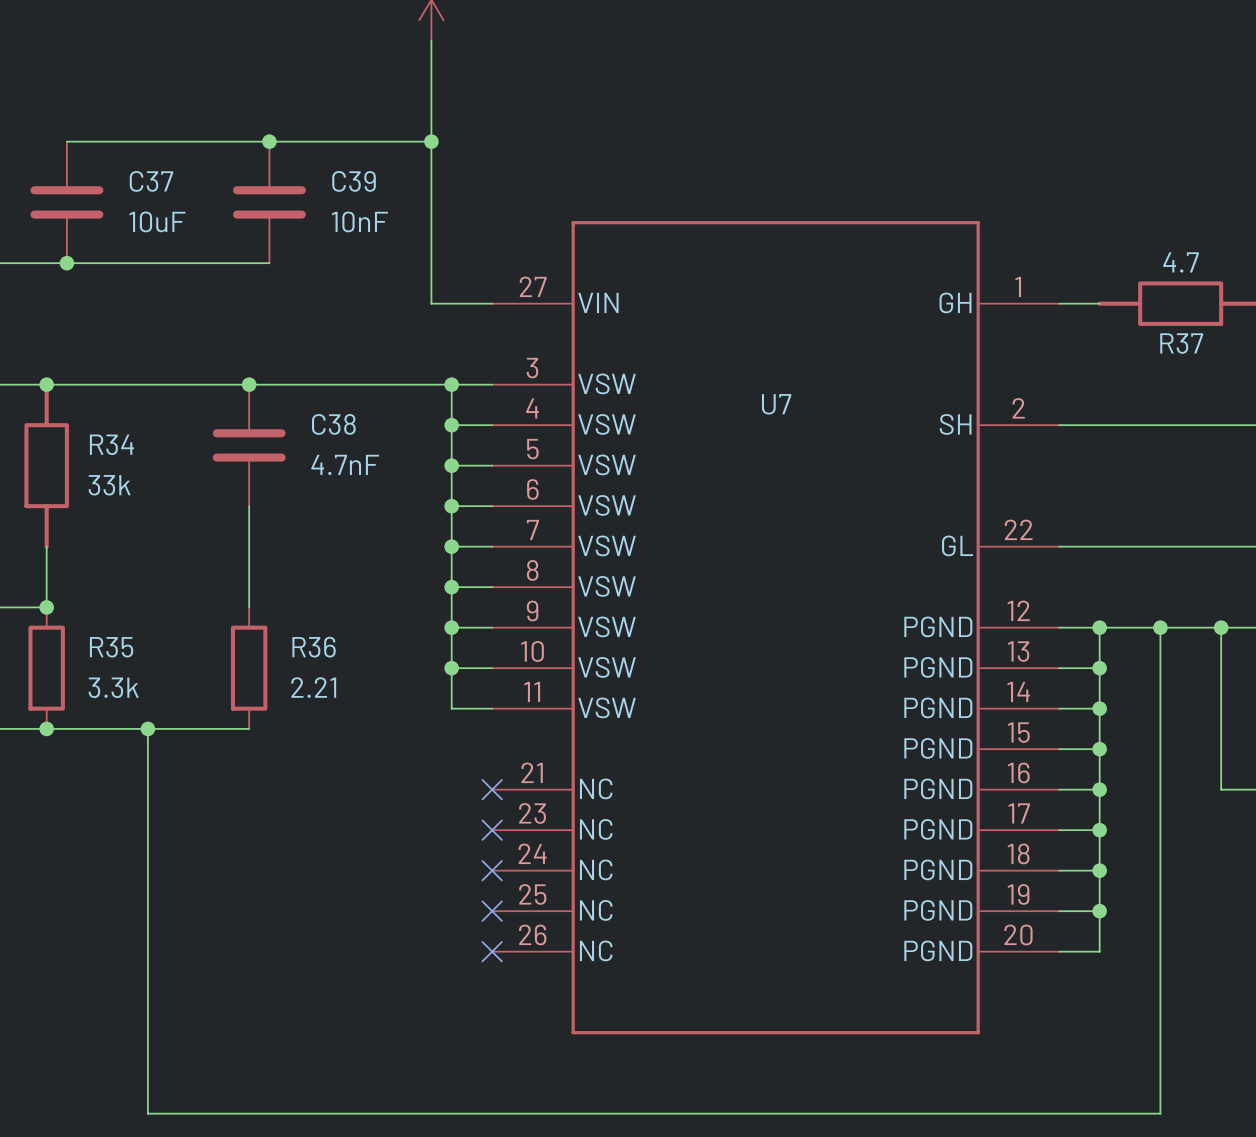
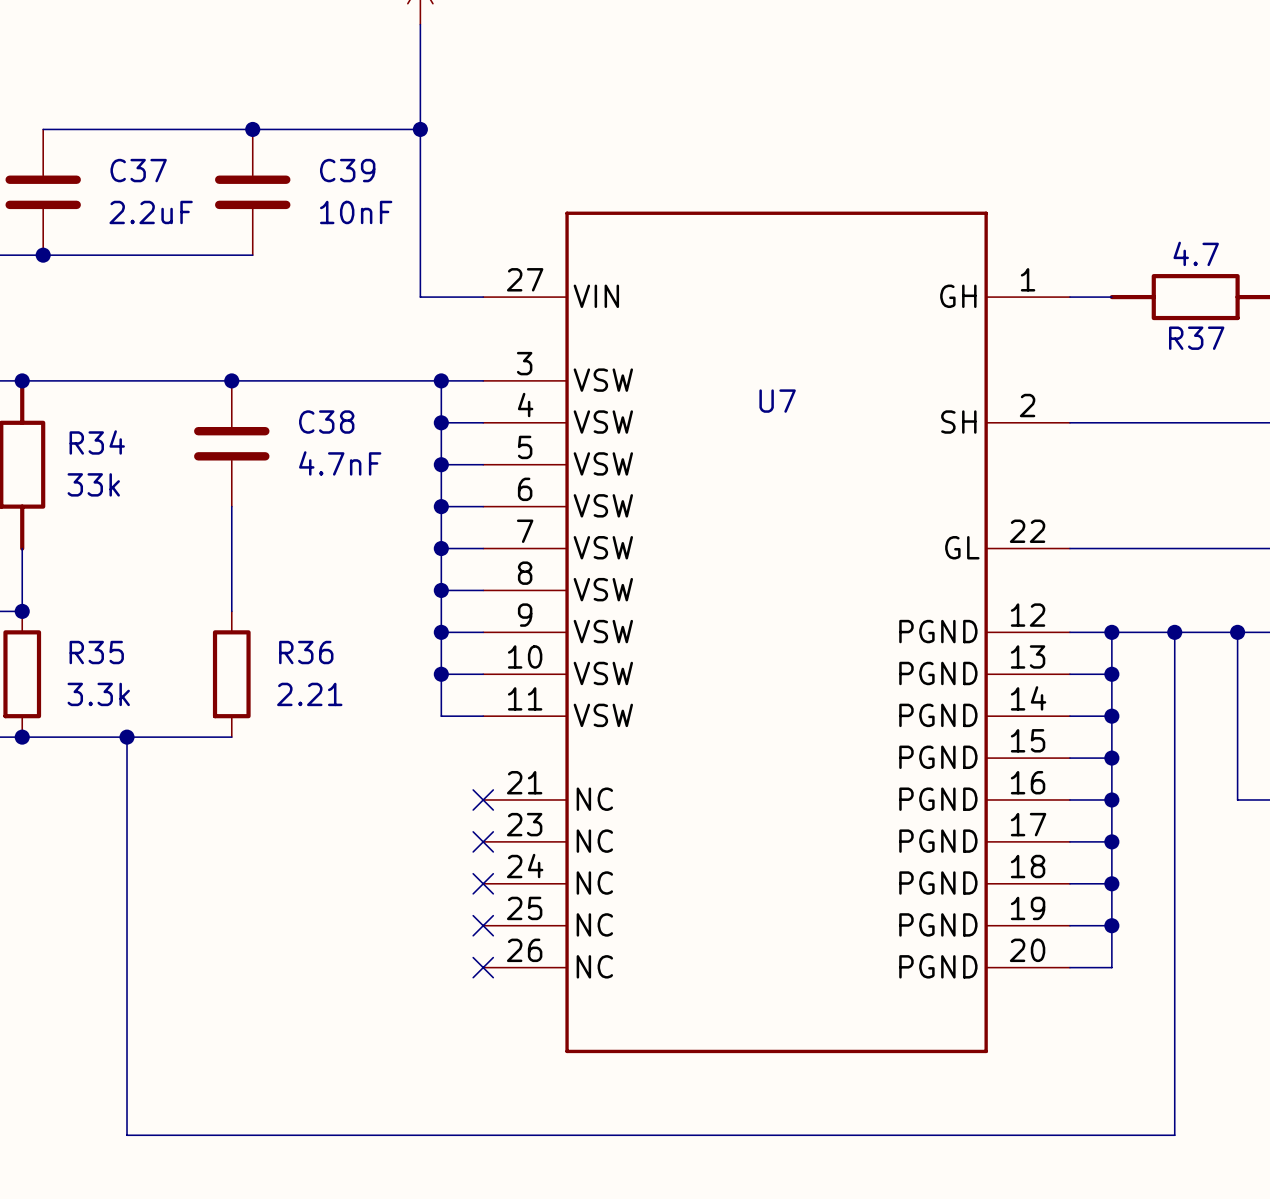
C37 value: 10uF (157, 221) -> 2.2uF (151, 212)

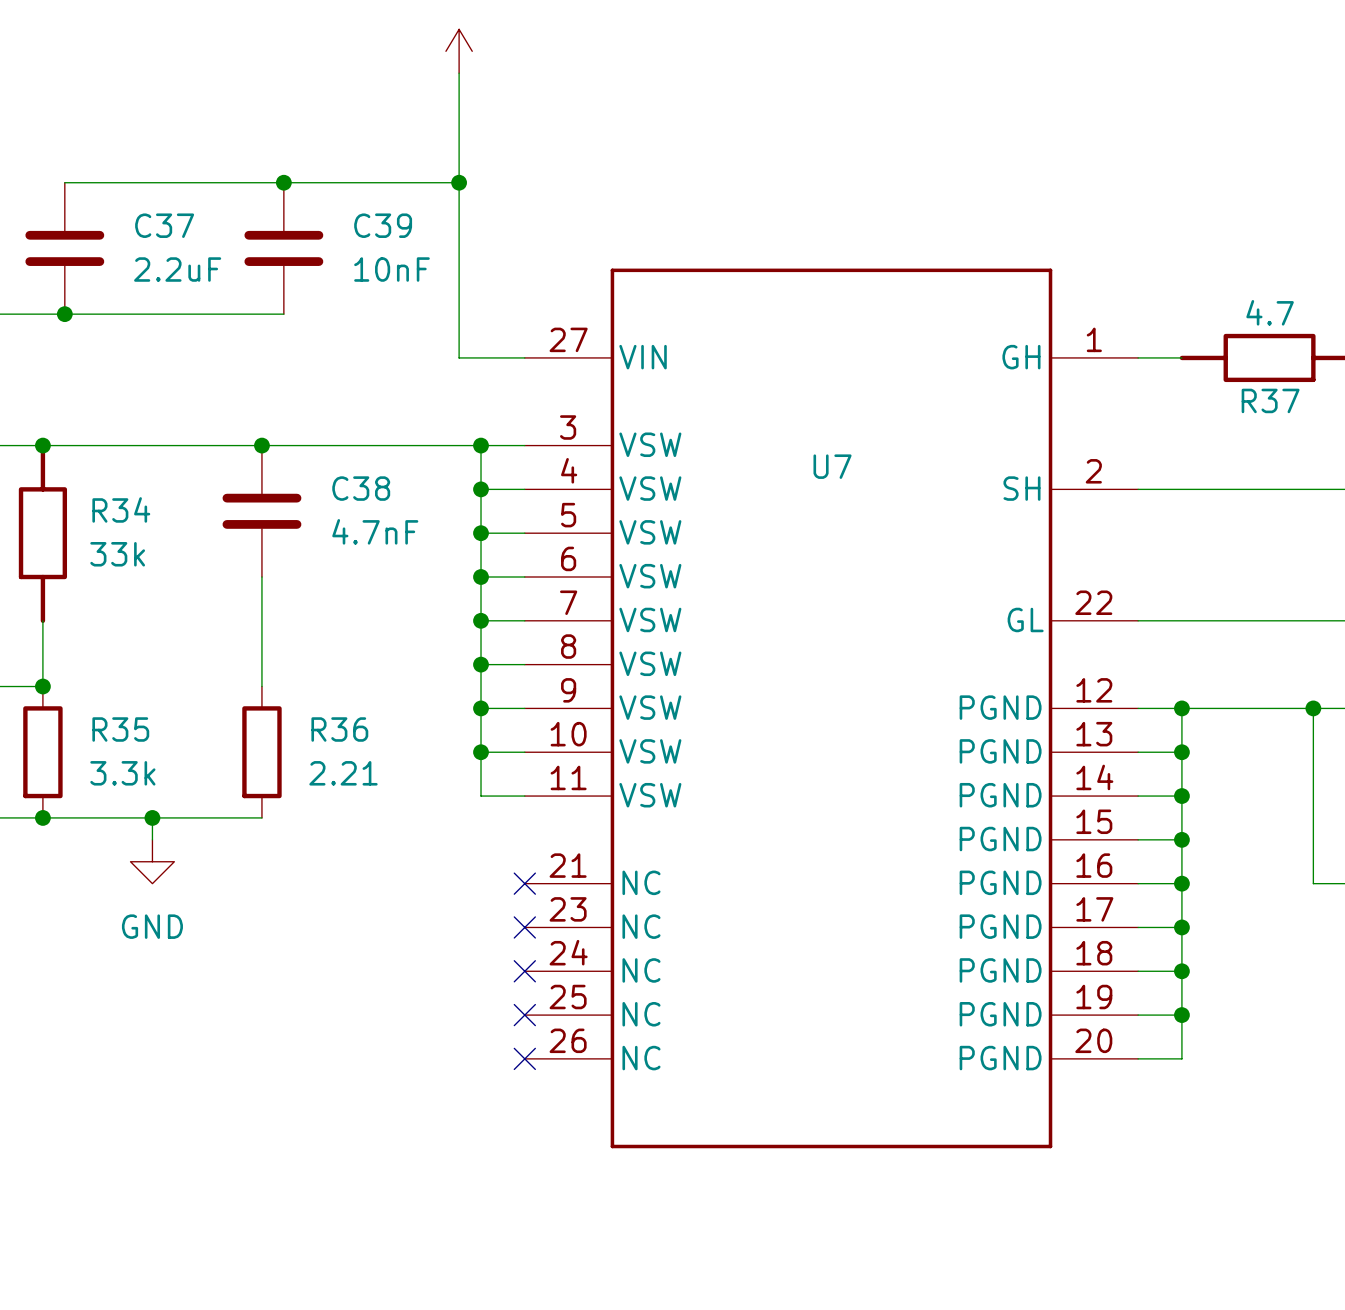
wire: (1174, 632) (1174, 1135) (127, 1135) (127, 758) -> none
junction: (1174, 632) -> none
power symbol: none -> GND (152, 861)

